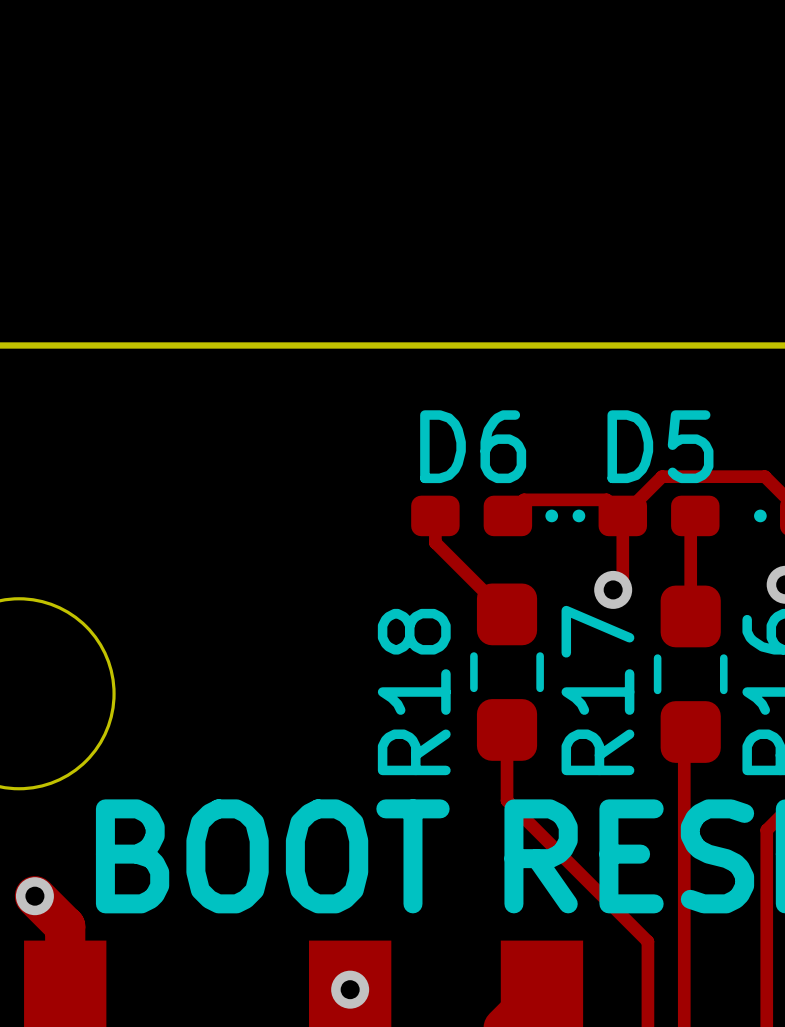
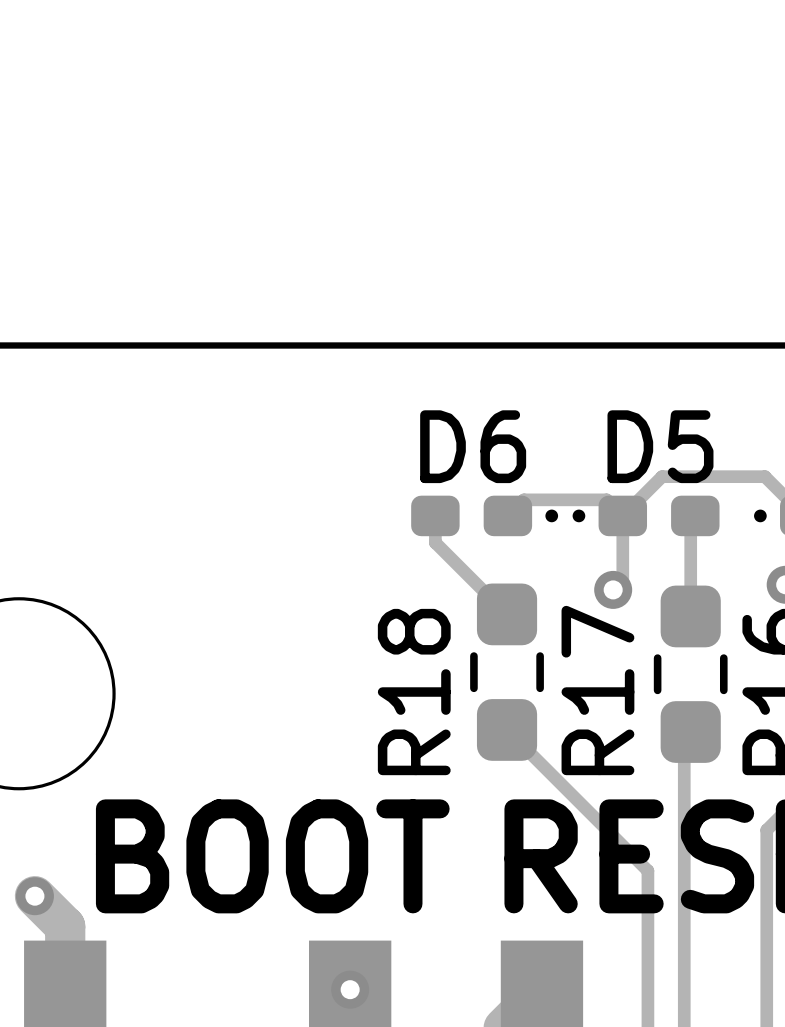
track: (507, 729) (507, 800) (647, 941) -> (507, 729) (647, 870) (647, 941)

